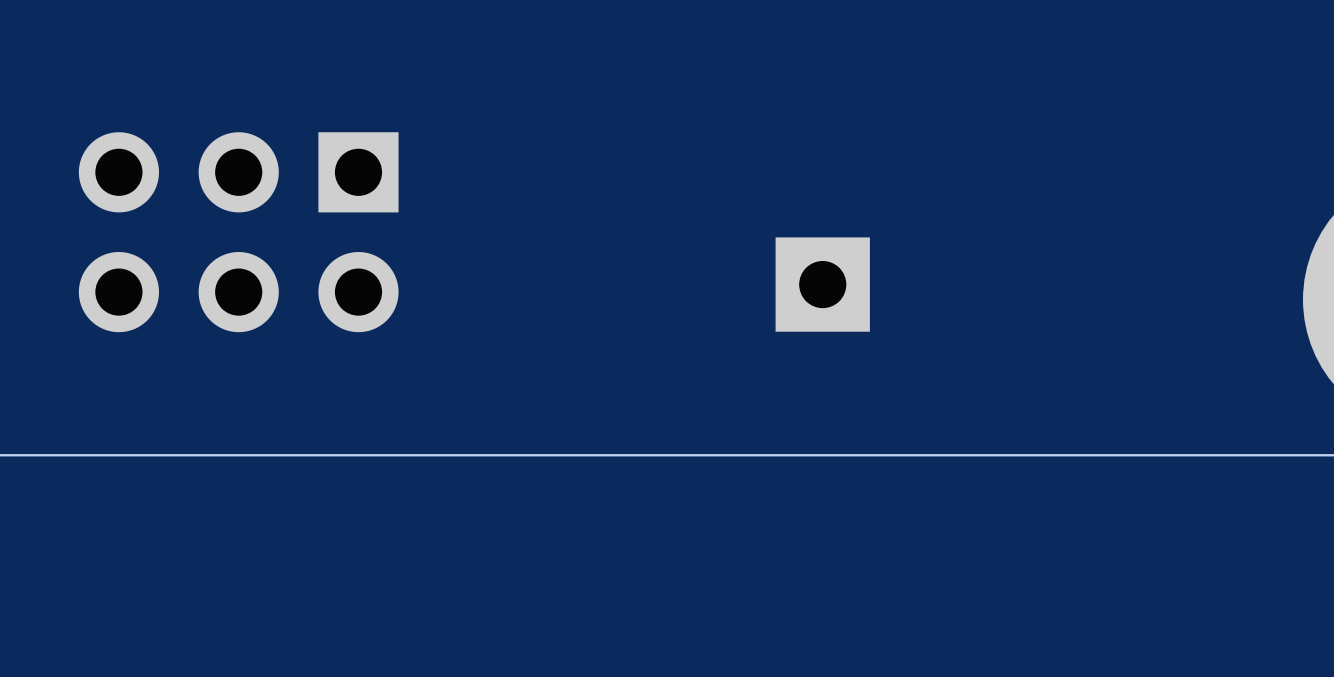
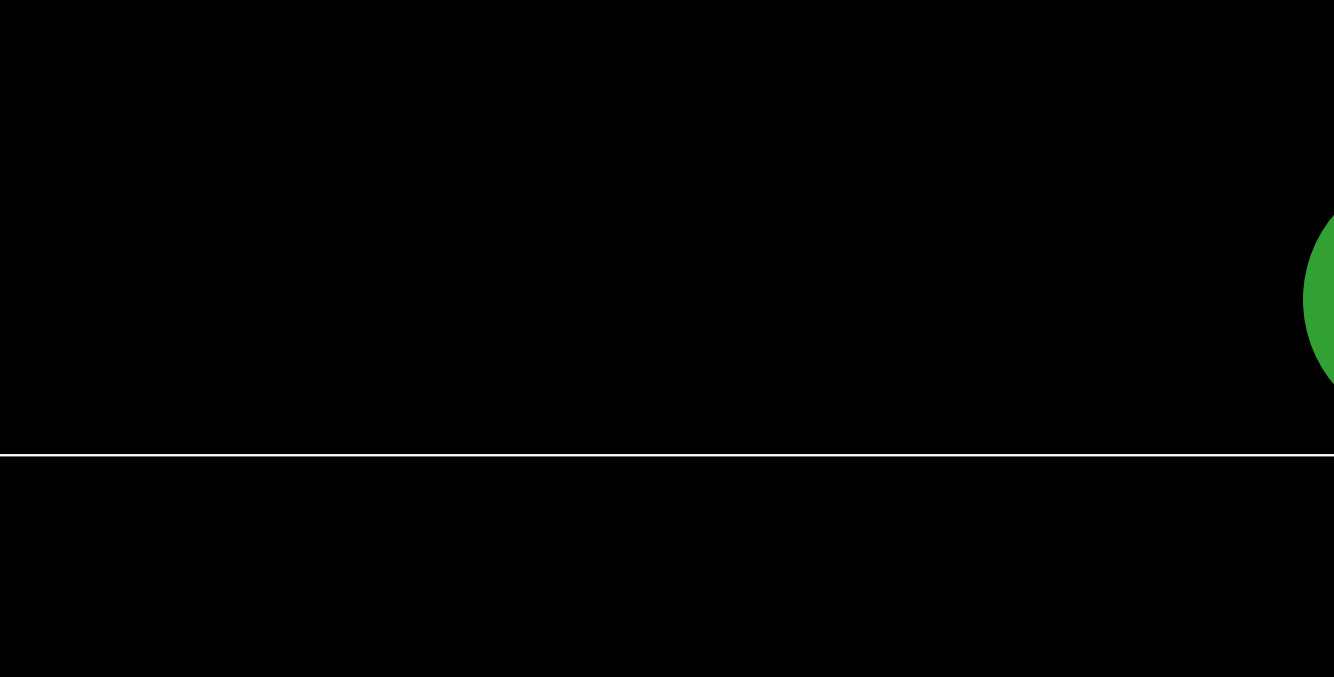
part: (238, 232) -> none
part: (822, 284) -> none

